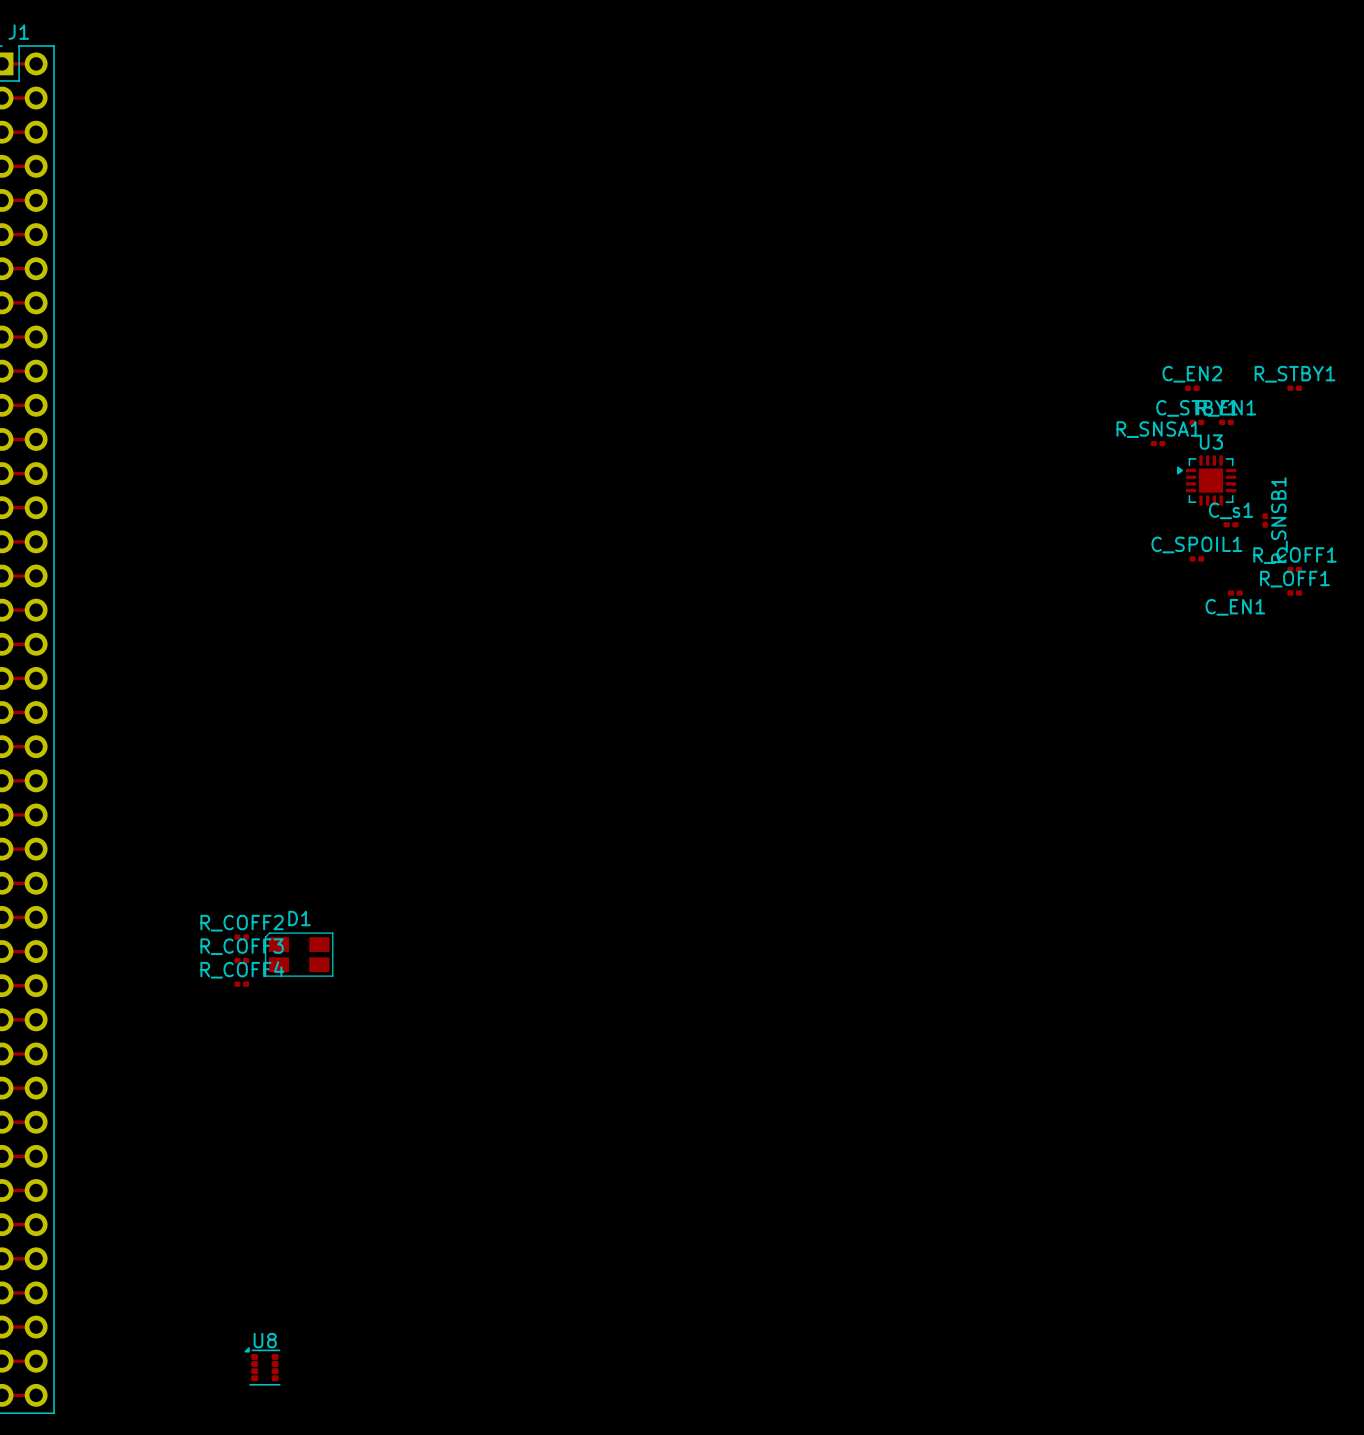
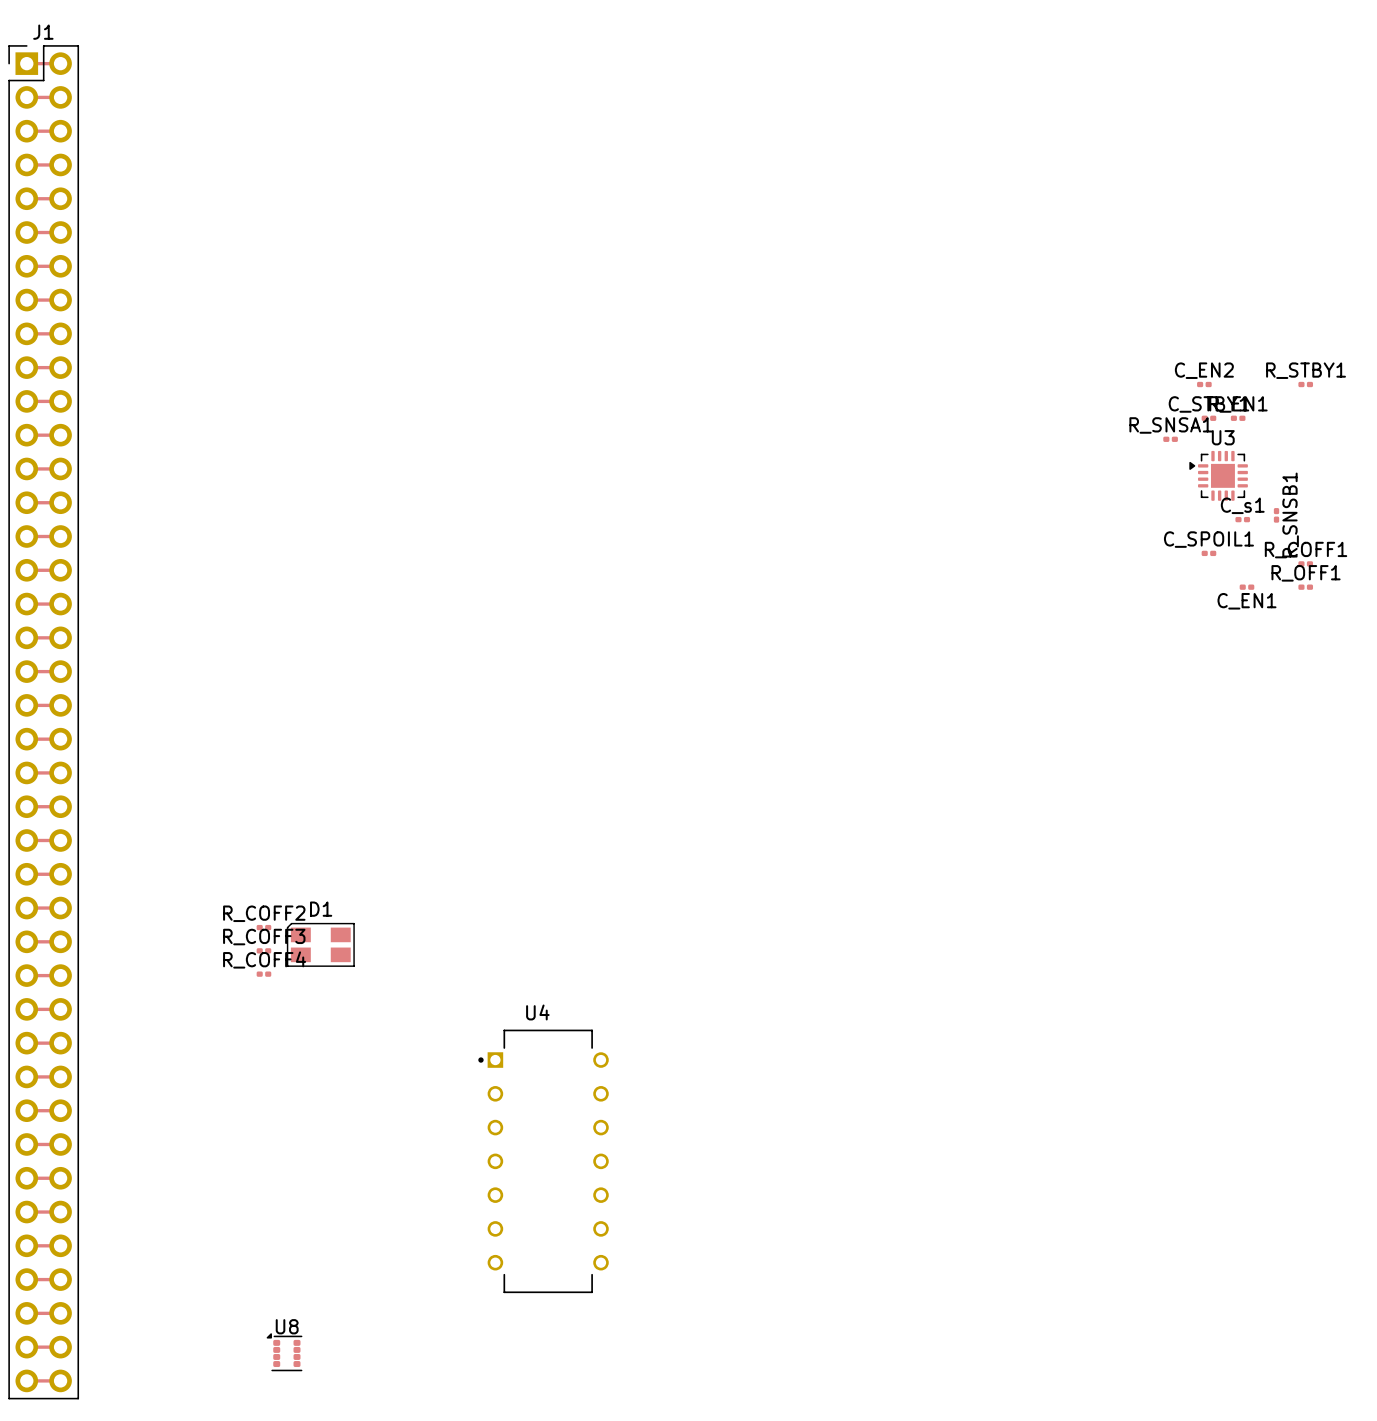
U4: none -> (543, 1161)

